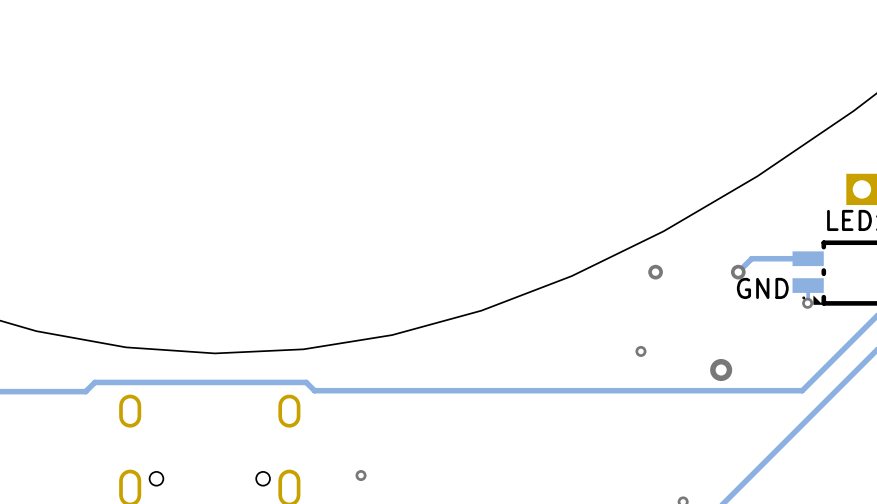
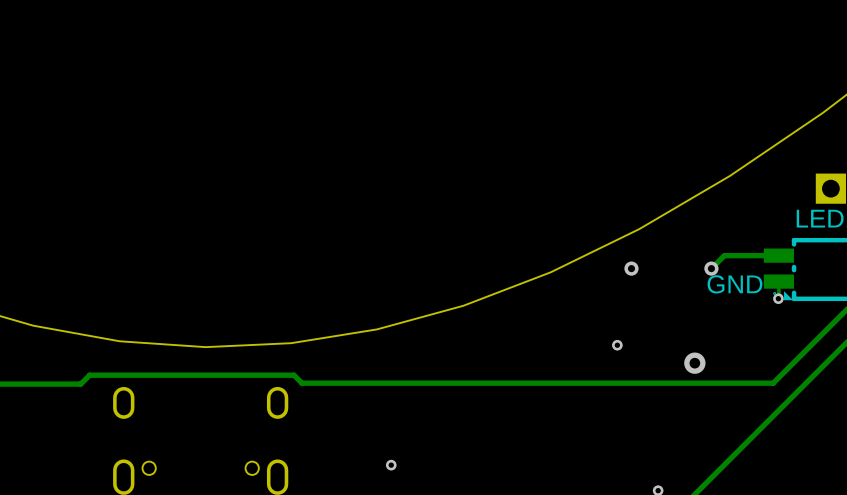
via position: (361, 475) -> (391, 465)

